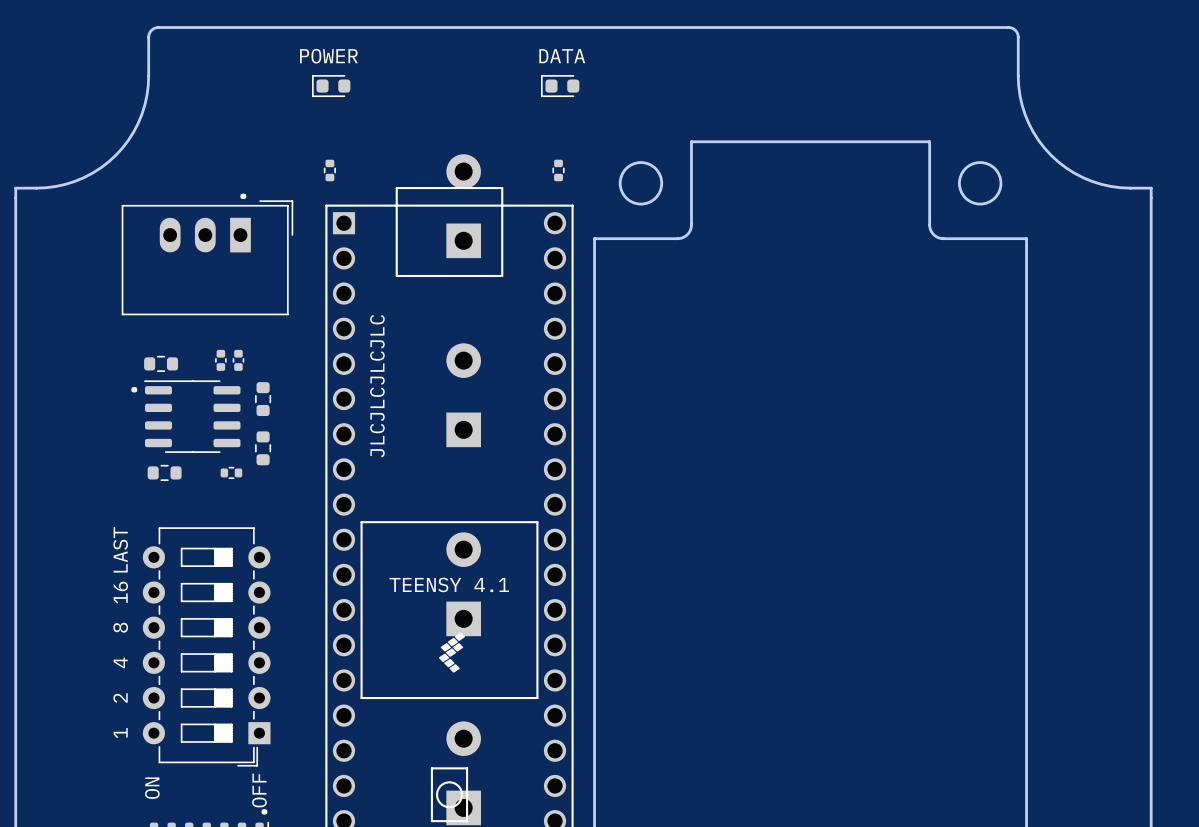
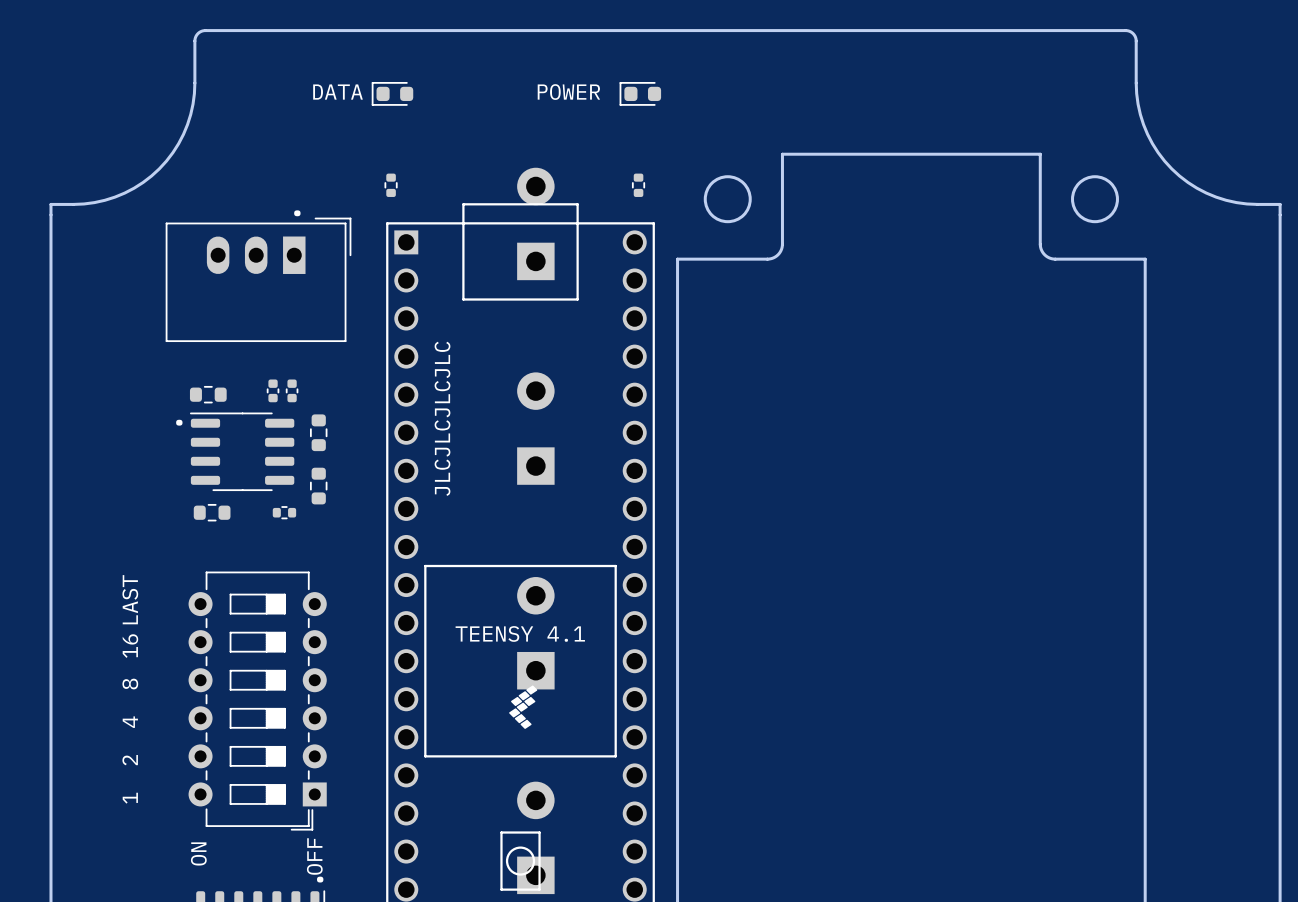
text position: POWER (328, 56) -> POWER (568, 92)
text position: DATA (562, 56) -> DATA (338, 92)
text position: LAST (120, 549) -> LAST (130, 599)
text position: 16 (120, 592) -> 16 (130, 646)
text position: 8 (120, 627) -> 8 (130, 684)
text position: 4 (120, 662) -> 4 (130, 722)
text position: 2 (120, 698) -> 2 (130, 760)
text position: 1 (120, 733) -> 1 (130, 798)

